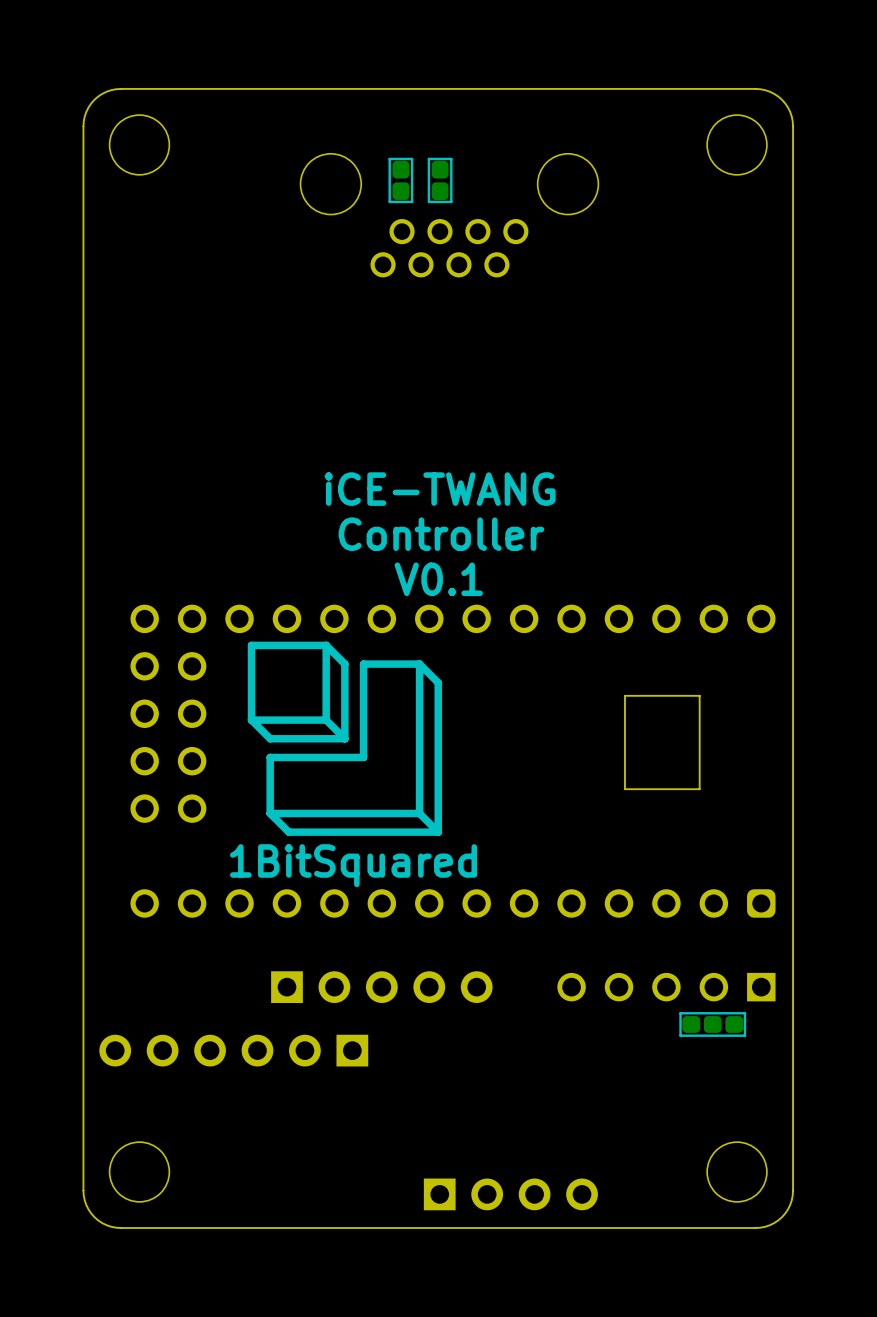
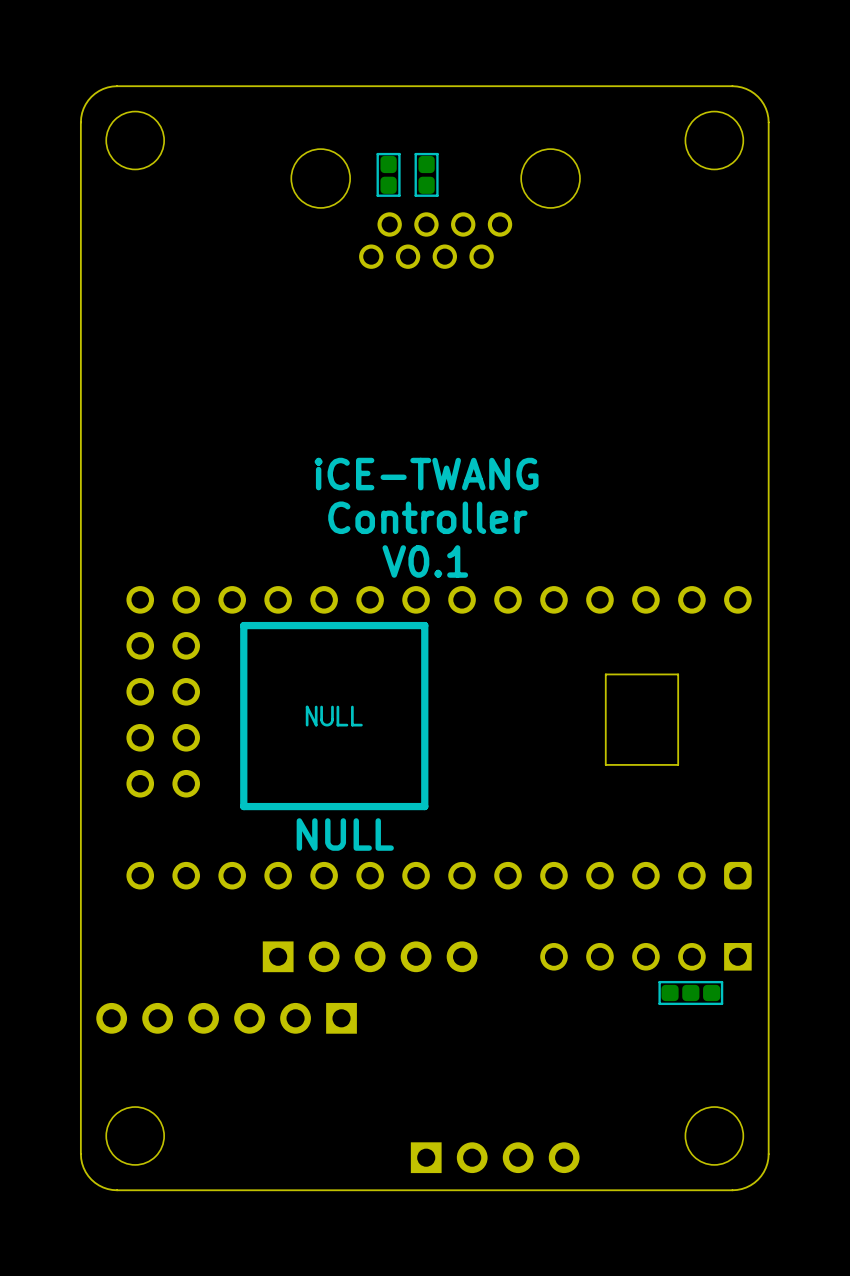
drawing shape: [247, 641, 442, 836] -> [240, 621, 429, 811]
text: 1BitSquared (353, 865) -> NULL (345, 834)

